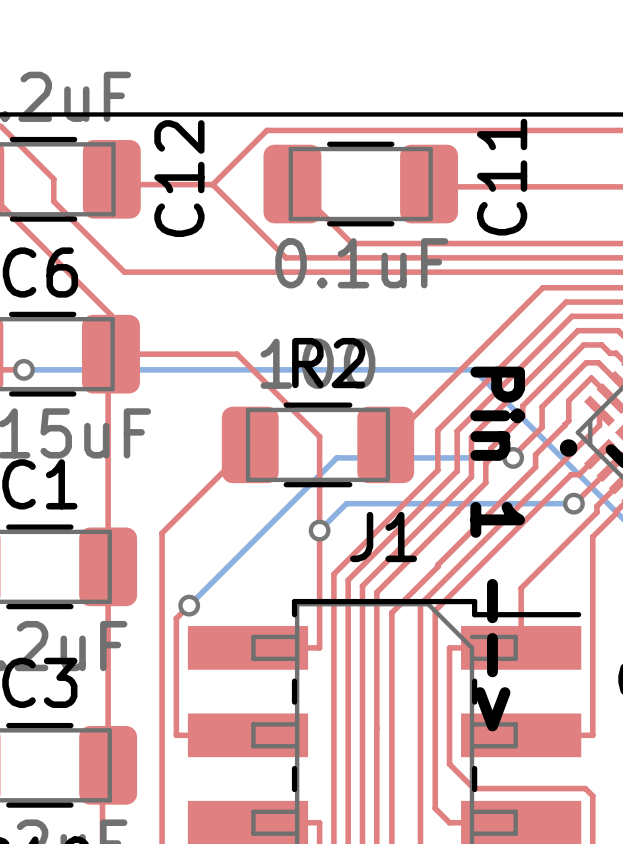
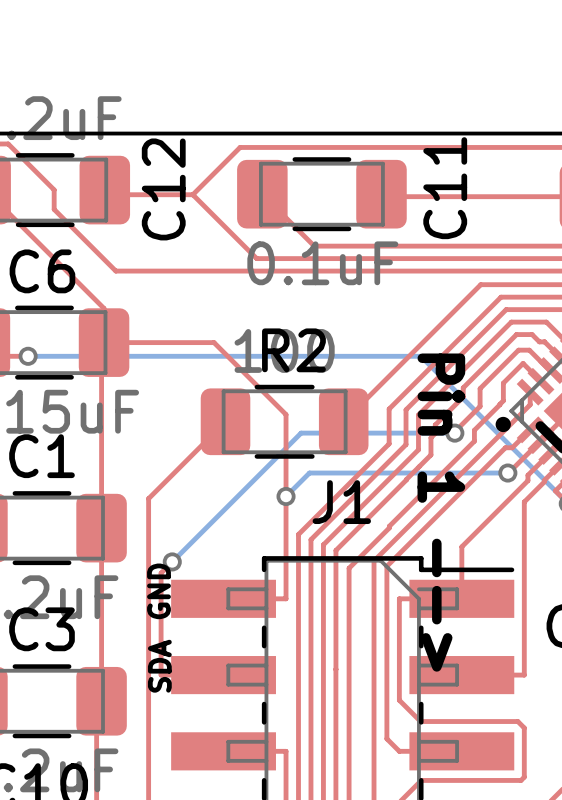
text: none -> GND (158, 591)
text: none -> SDA (159, 666)

